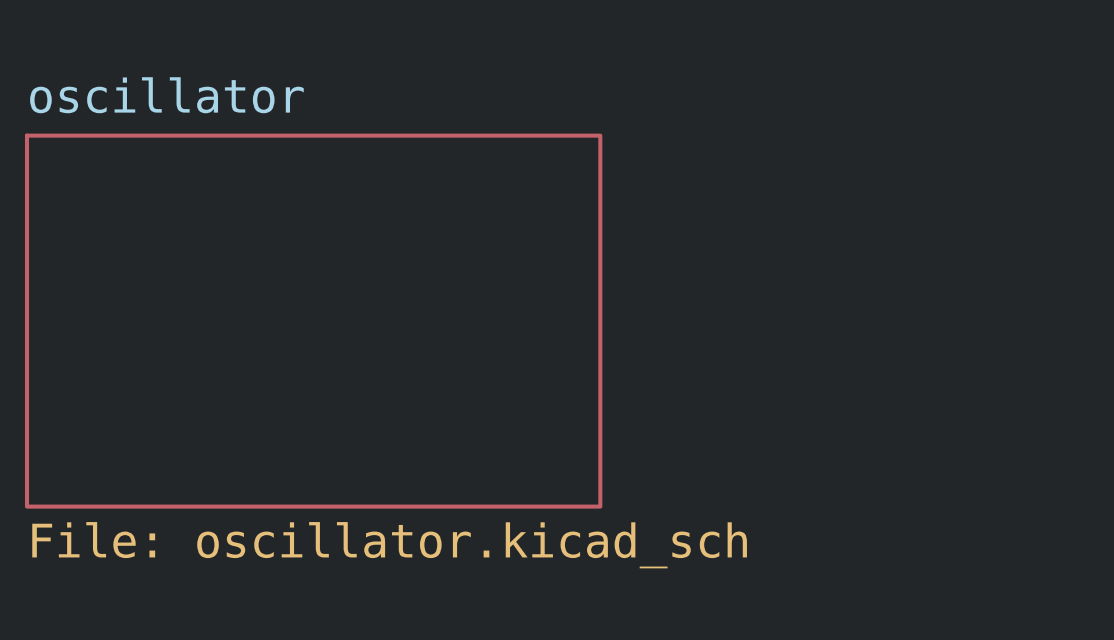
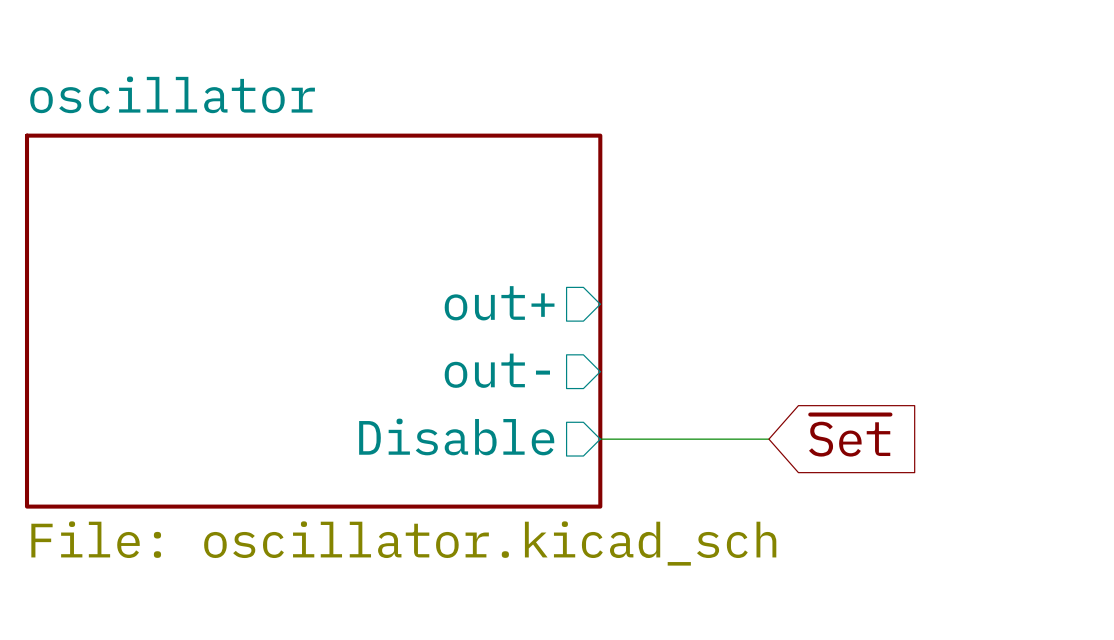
sheet pin: none -> out+ (499, 303)
sheet pin: none -> out- (497, 370)
global label: none -> ~{Set} (849, 435)
sheet pin: none -> Disable (456, 436)
wire: none -> (600, 439) (768, 439)

